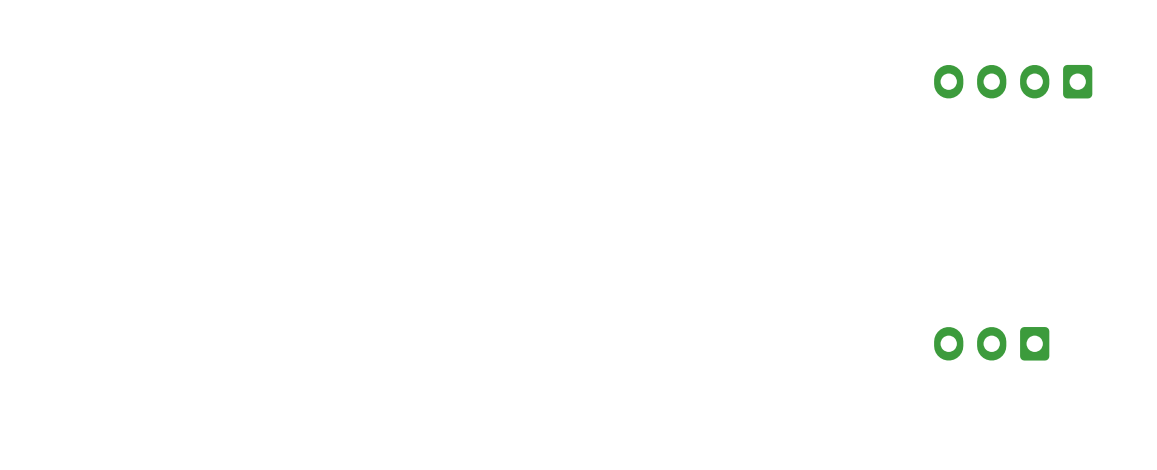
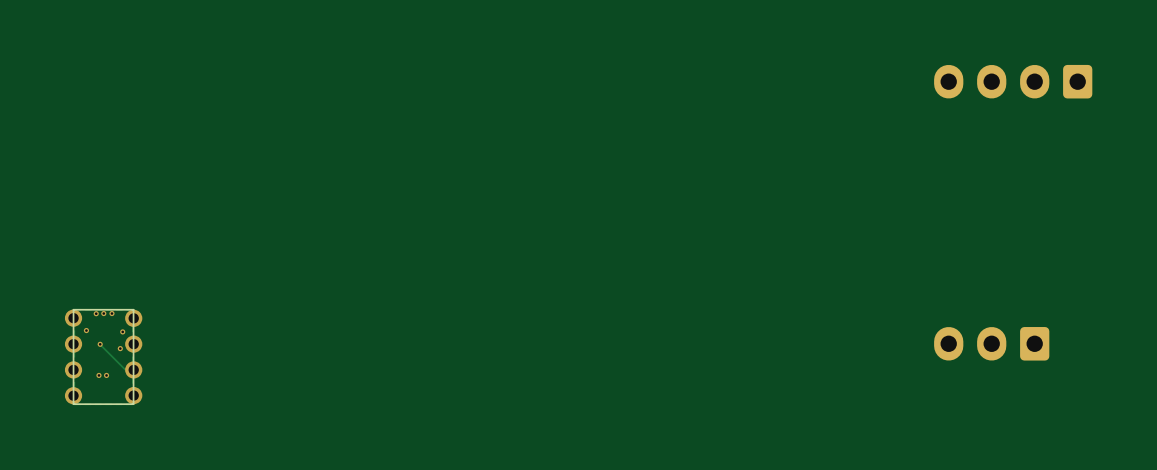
board edge: none -> (133, 309) (73, 309) (73, 404) (133, 404) (133, 309)
via: none -> (96, 313)
via: none -> (103, 313)
via: none -> (111, 313)
via: none -> (73, 318)
via: none -> (133, 318)
via: none -> (86, 330)
via: none -> (122, 331)
via: none -> (73, 344)
track: none -> (99, 344) (124, 369) (127, 369)
via: none -> (100, 344)
via: none -> (133, 344)
via: none -> (120, 348)
via: none -> (73, 369)
via: none -> (133, 369)
via: none -> (98, 375)
via: none -> (106, 375)
via: none -> (73, 395)
via: none -> (133, 395)

